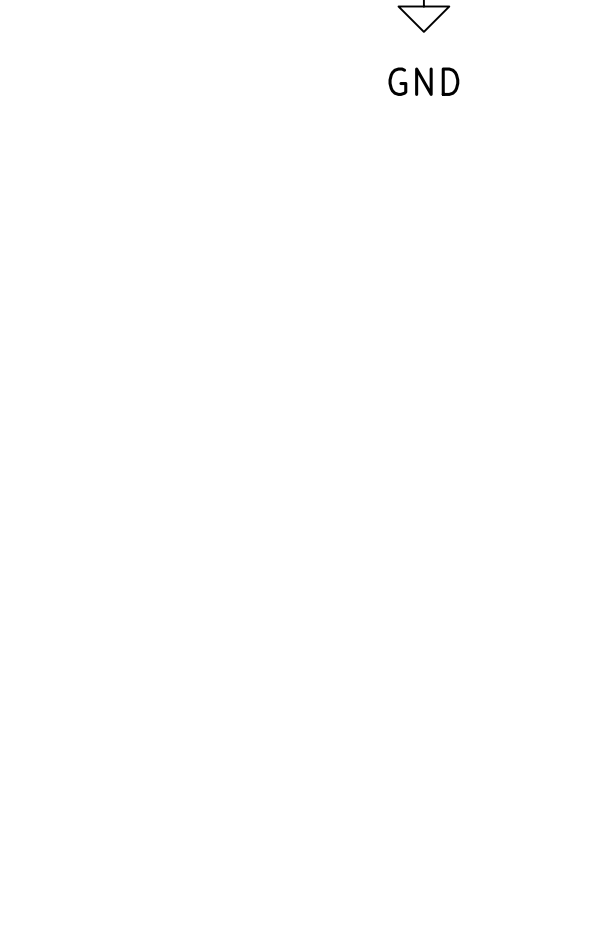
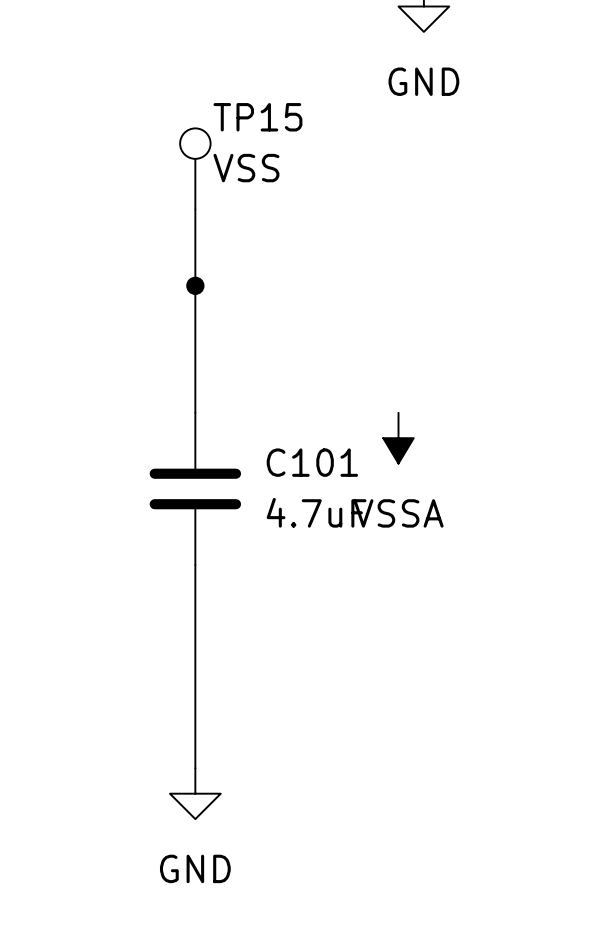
TP15: none -> VSS (195, 169)
wire: none -> (195, 209) (195, 412)
junction: none -> (195, 285)
power symbol: none -> VSSA (398, 438)
C101: none -> 4.7uF (195, 488)
wire: none -> (195, 565) (195, 768)
power symbol: none -> GND (195, 793)

